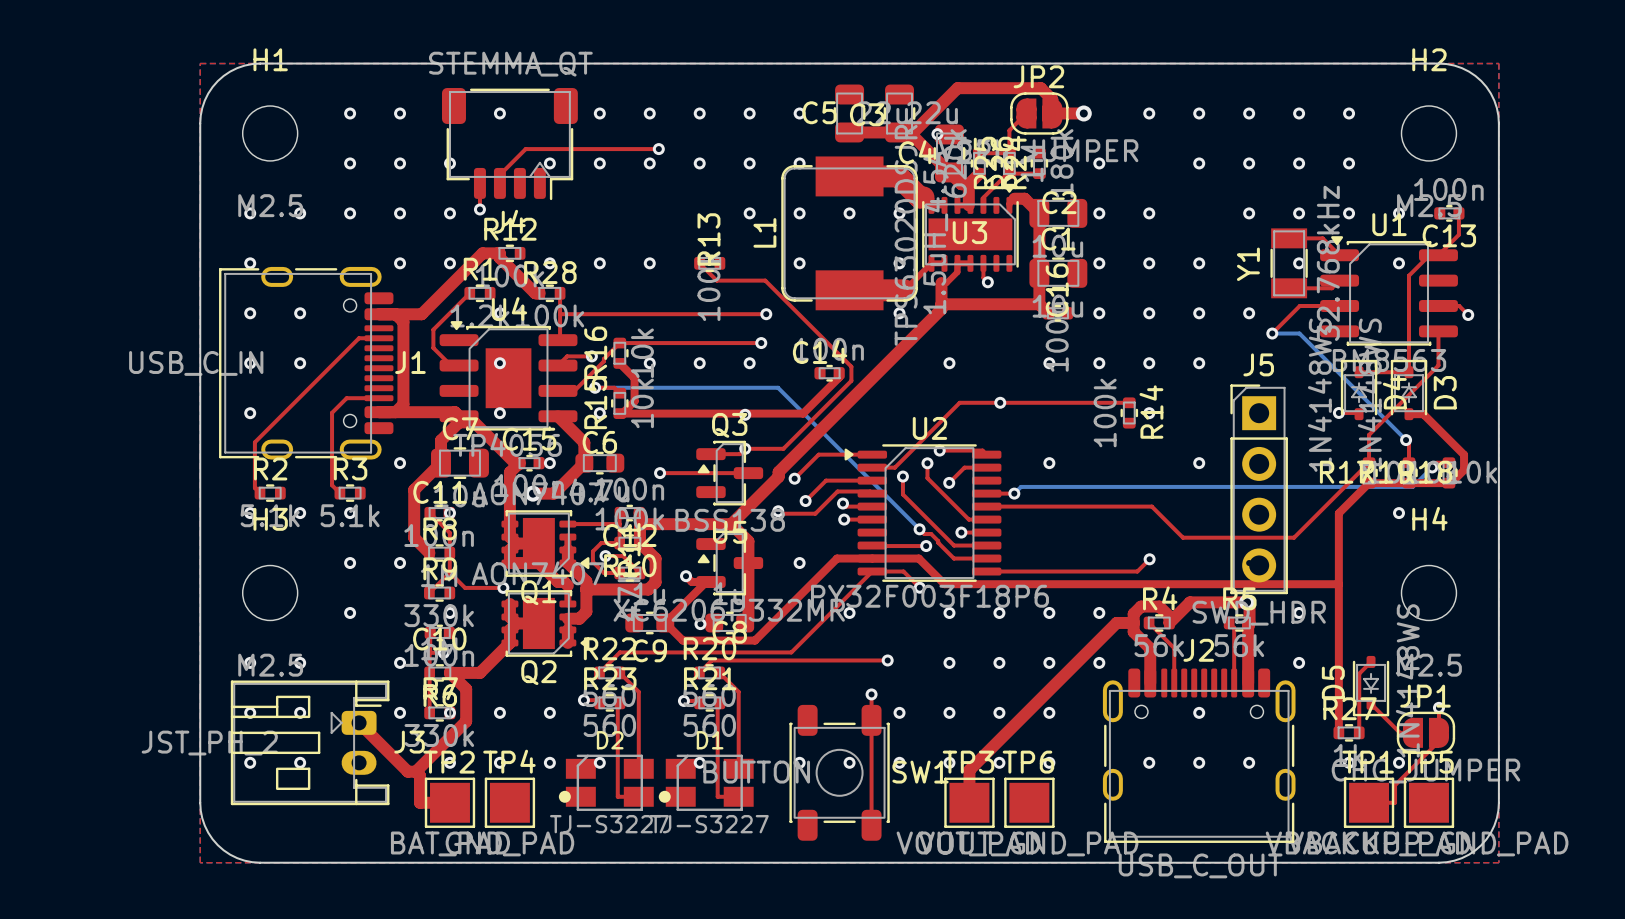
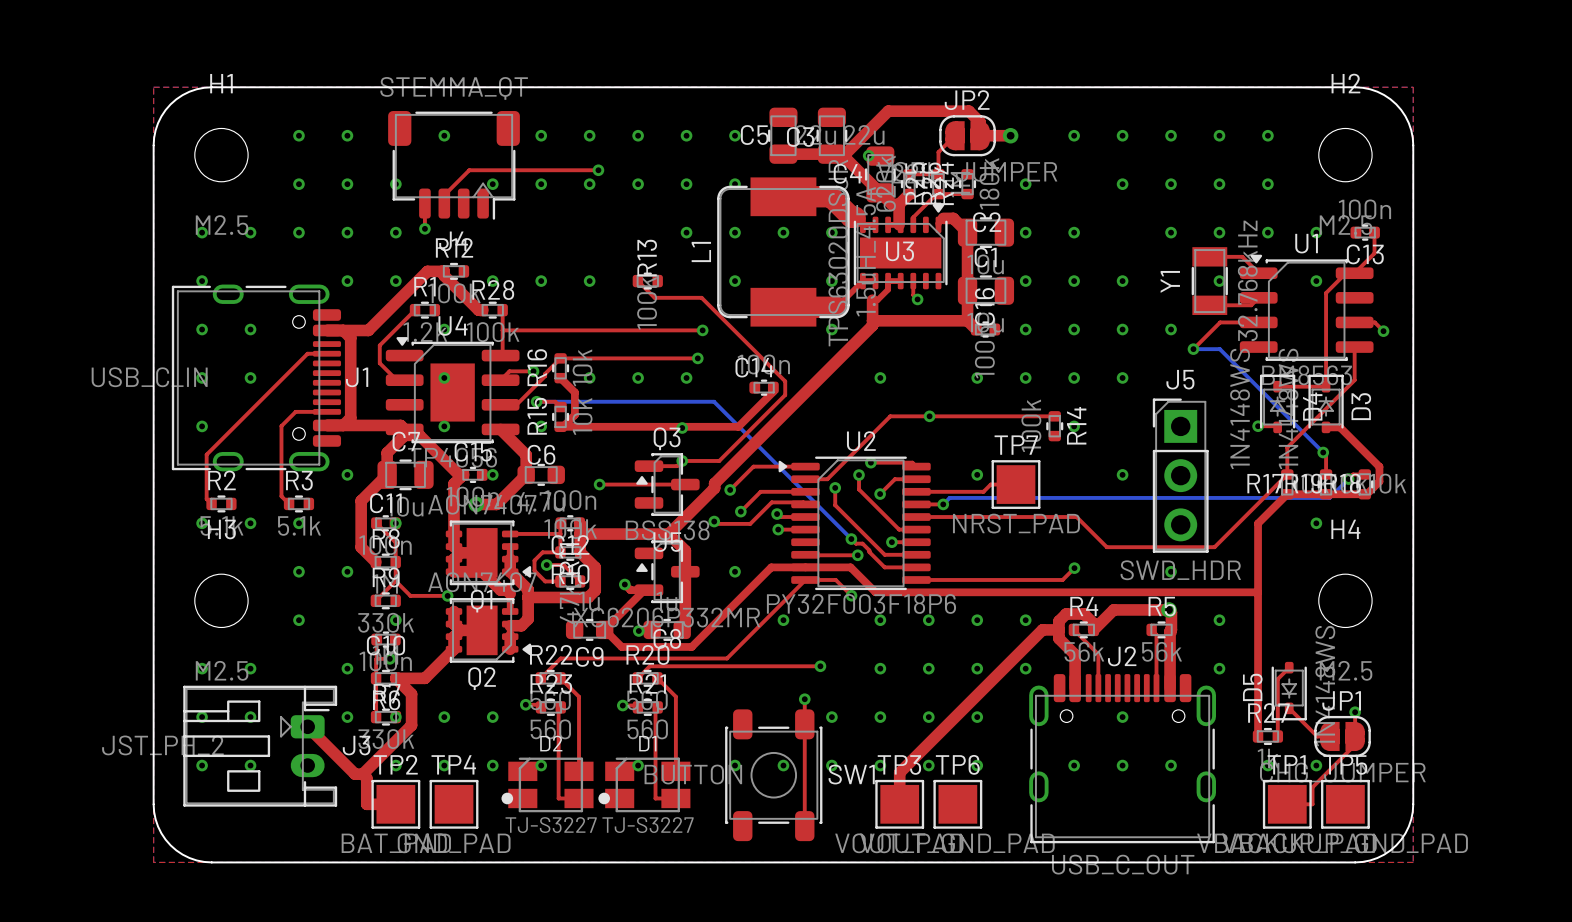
J5 footprint: [1230, 384, 1288, 595] -> [1152, 398, 1209, 553]
top track: none -> (1016, 484) (990, 484) (983, 491) (916, 491)
TP7: none -> NRST_PAD (1016, 484)

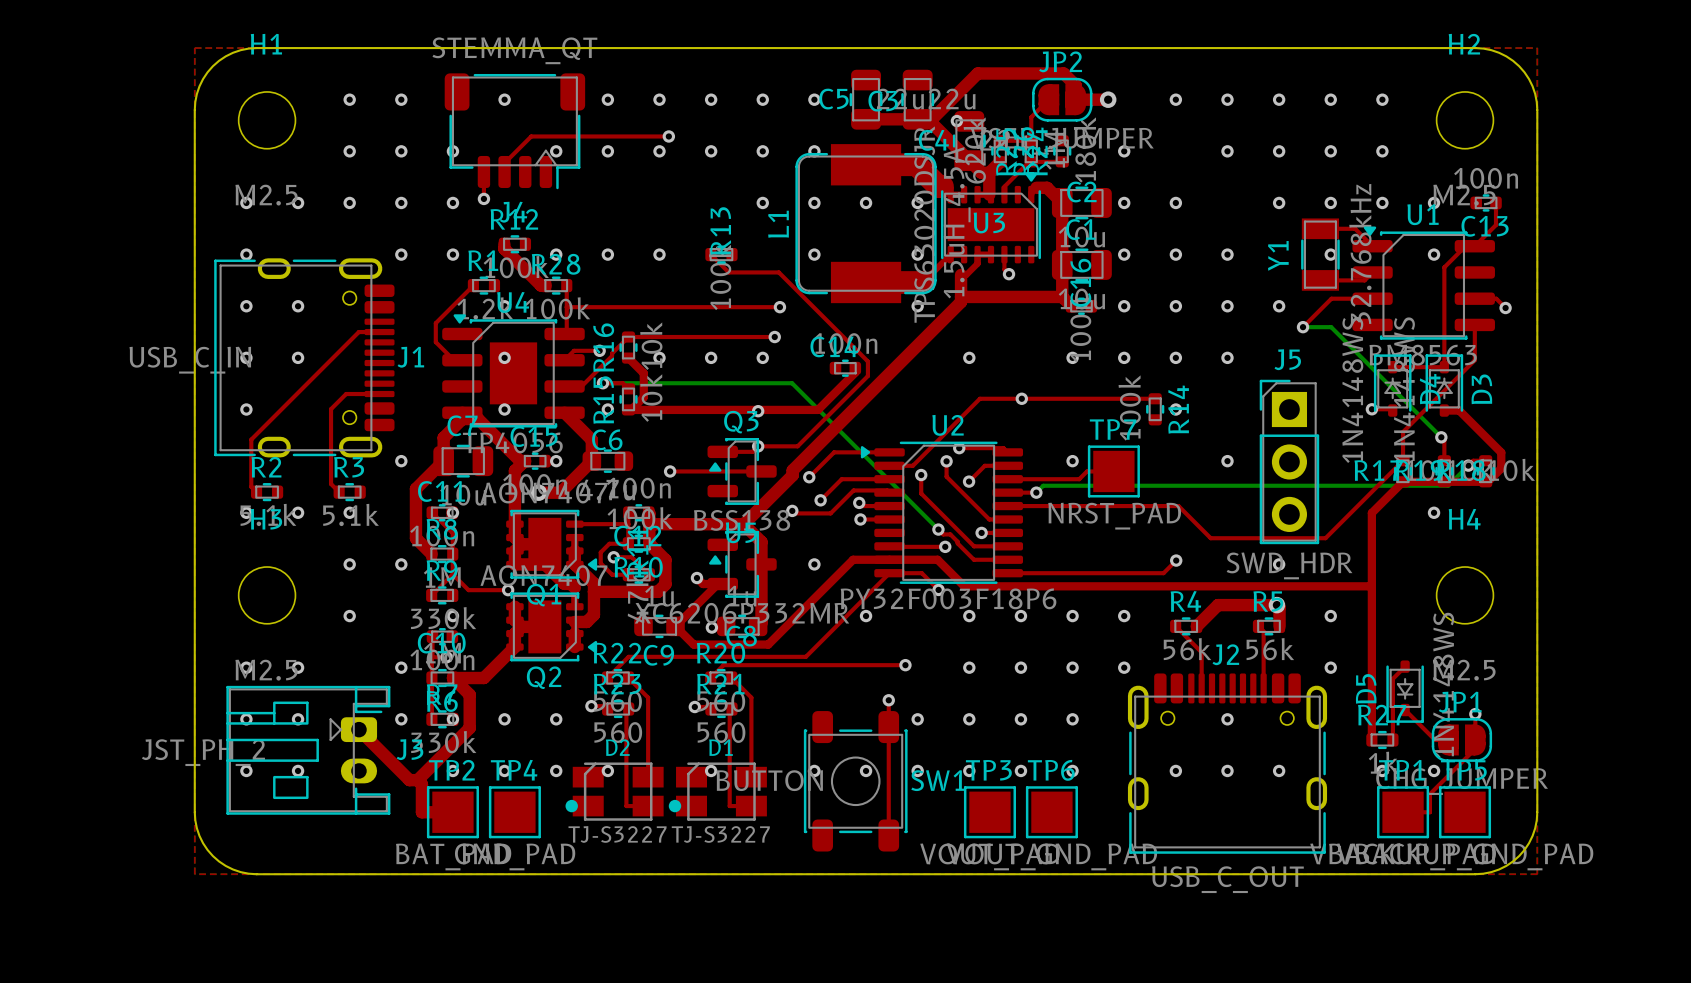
top track: (444, 271) (427, 271) (368, 330) (326, 330) -> none
top track: (343, 330) (350, 337) (350, 417) (343, 425) -> none
top track: (326, 425) (400, 425) (404, 429) -> none
top track: (1059, 629) (1042, 629) (899, 772) (899, 804) -> none
top track: (1093, 629) (1093, 623) (1084, 614) (1066, 614) (1059, 621) (1059, 638) (1075, 654) (1075, 688) -> none
top track: (1171, 629) (1170, 688) -> none

